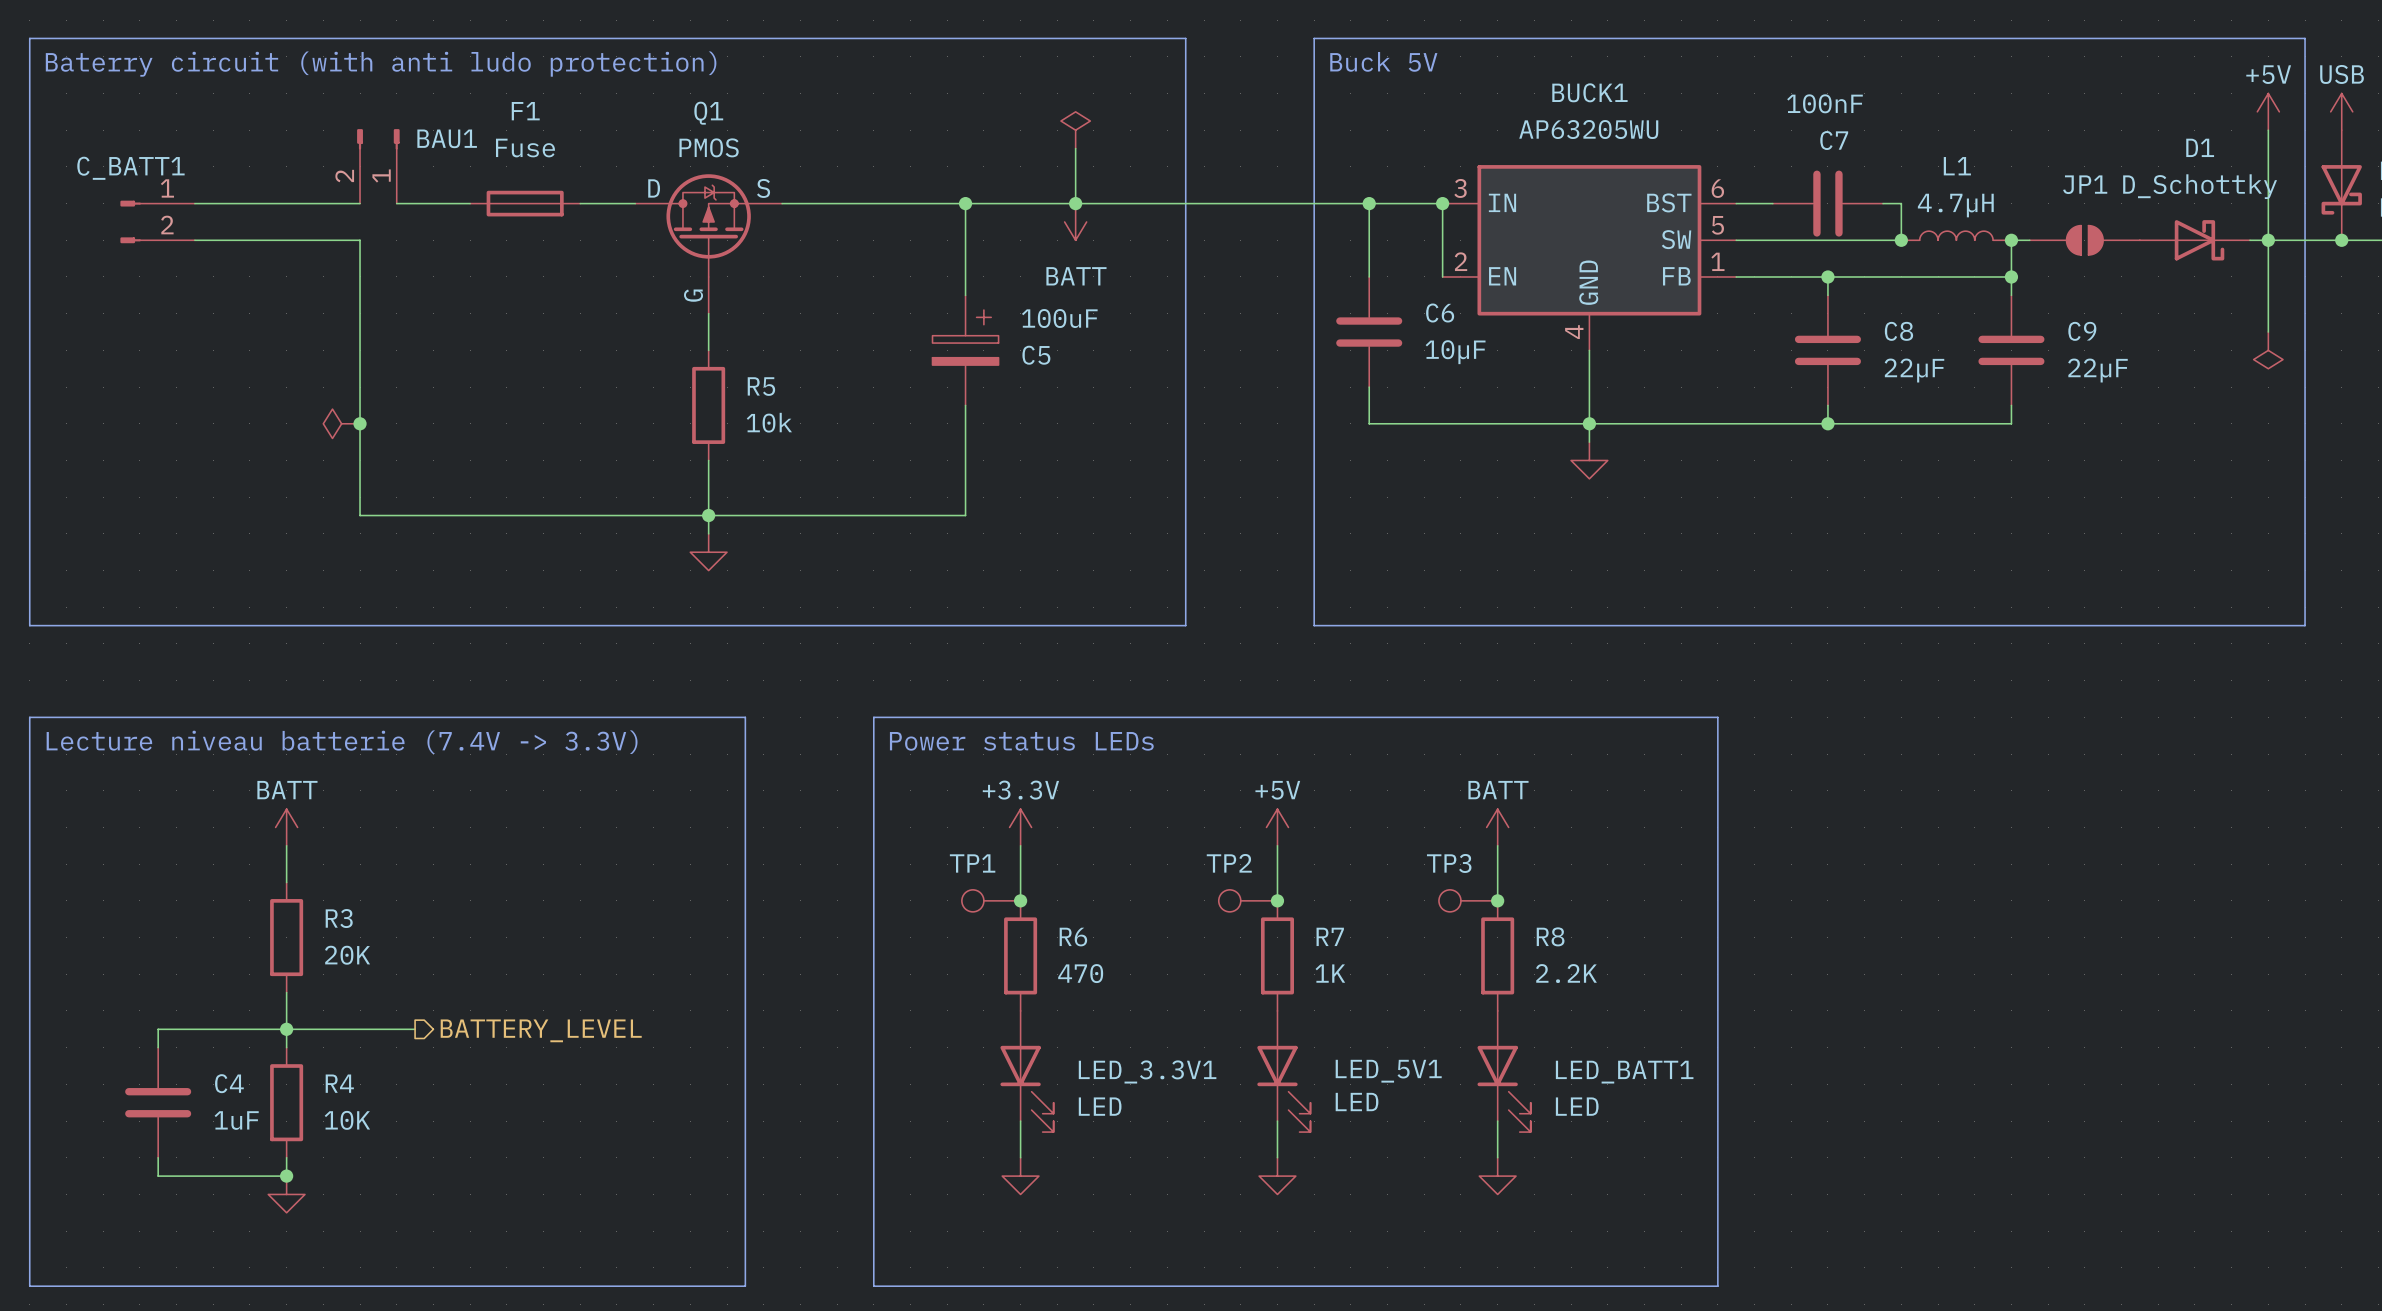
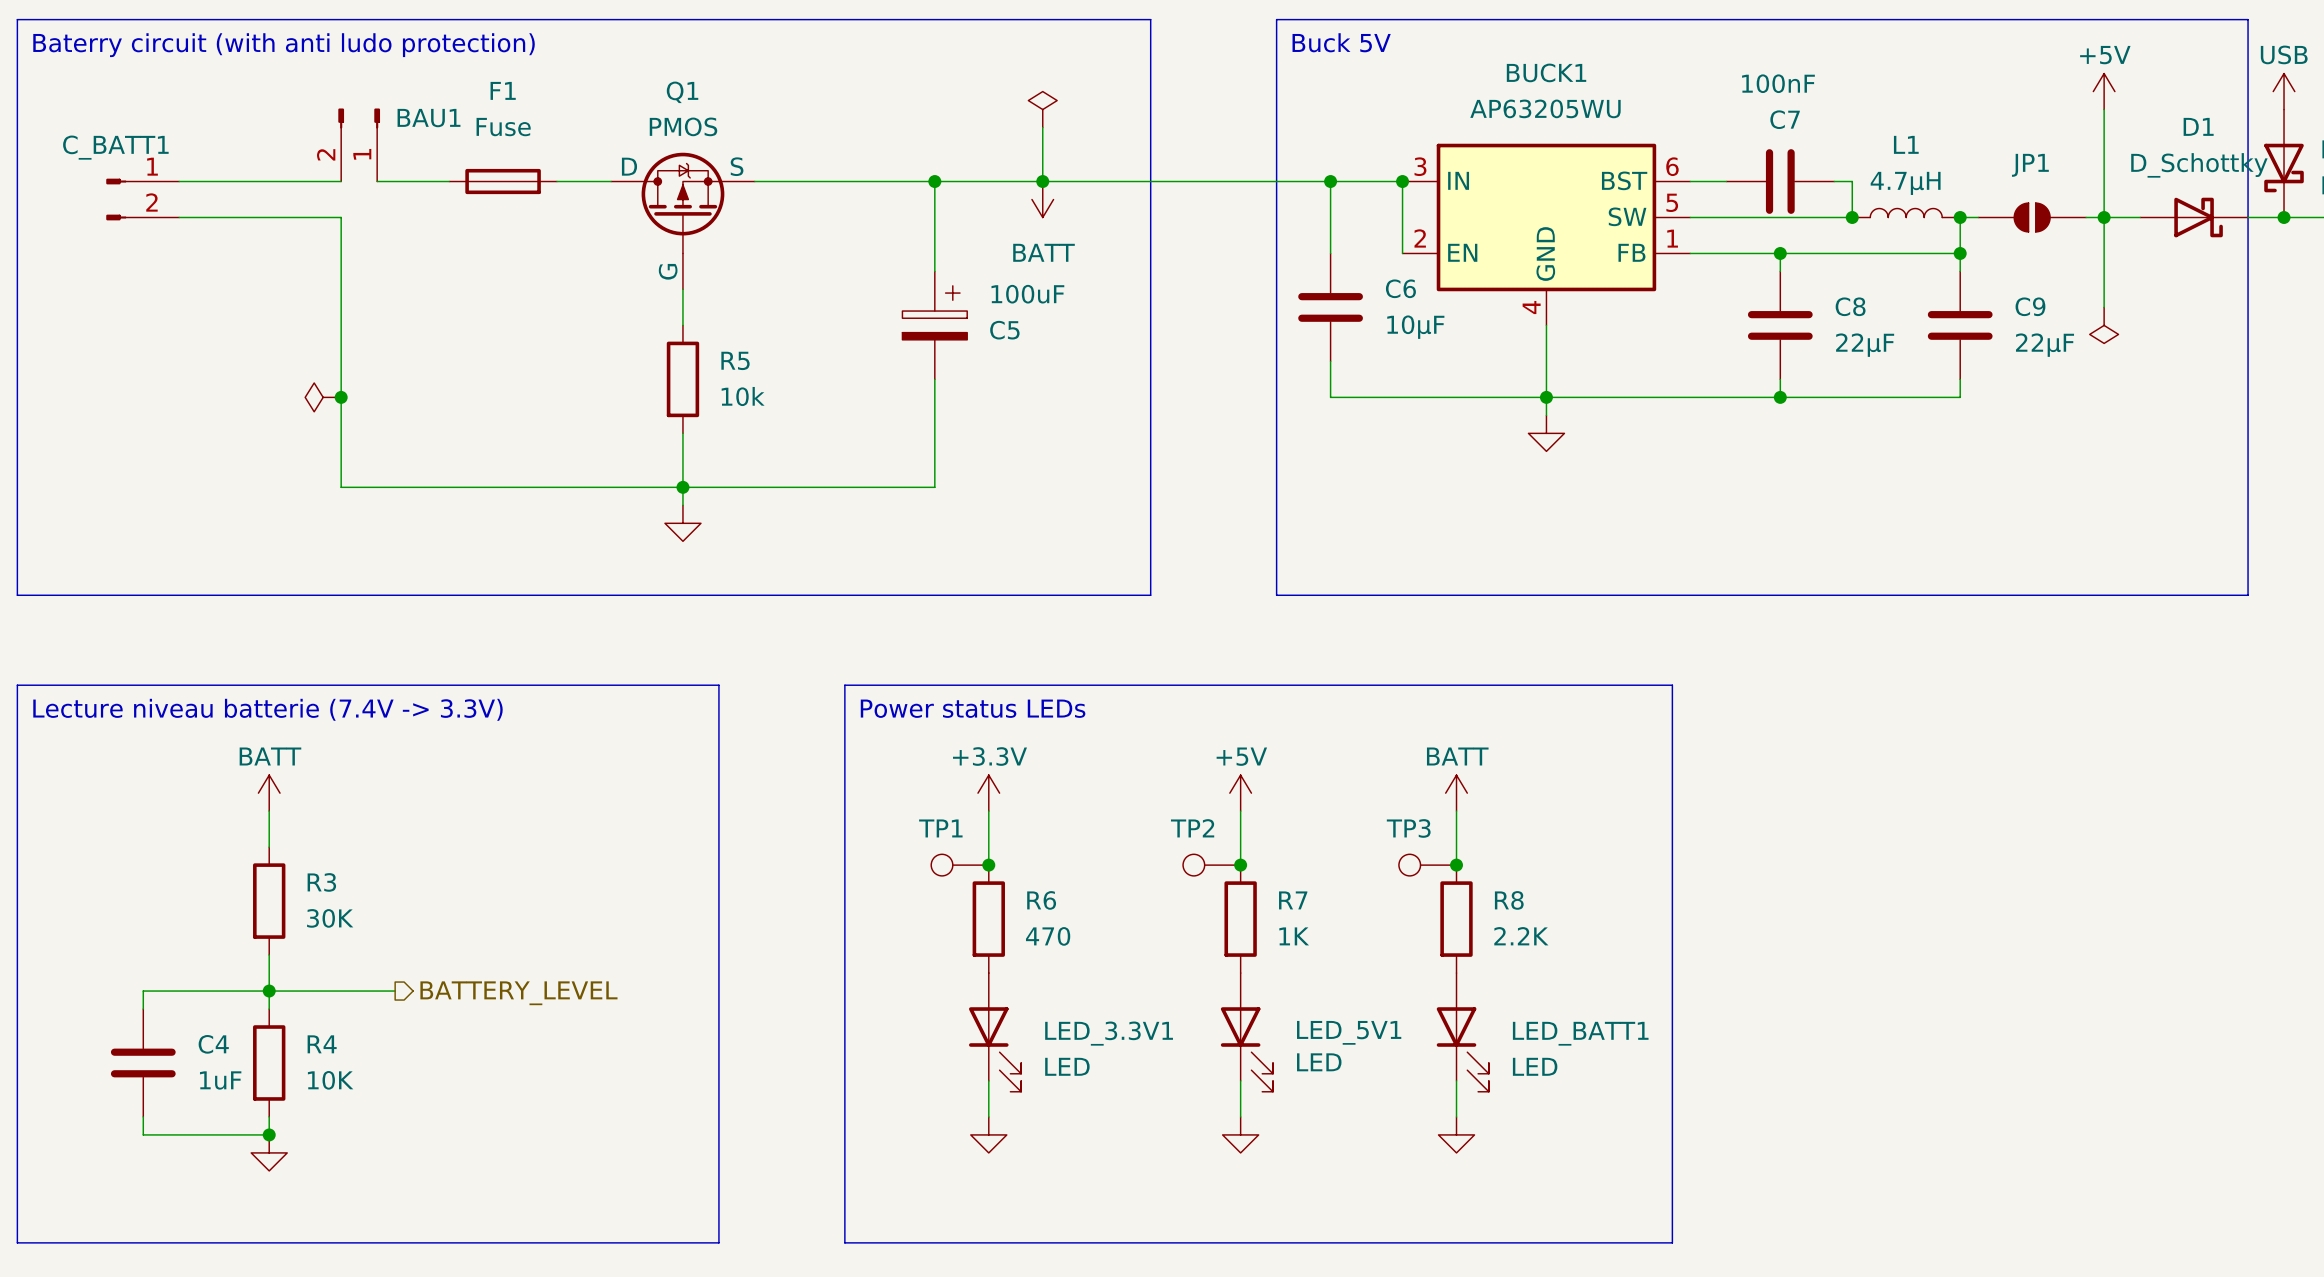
power symbol position: +5V (2268, 111) -> +5V (2104, 91)
wire: (2268, 130) (2268, 332) -> (2104, 109) (2104, 307)
junction: none -> (2104, 217)
D1 position: (2194, 240) -> (2194, 217)
junction: (2268, 240) -> none
power symbol position: (2268, 350) -> (2104, 325)
R3 value: 20K (347, 955) -> 30K (330, 918)

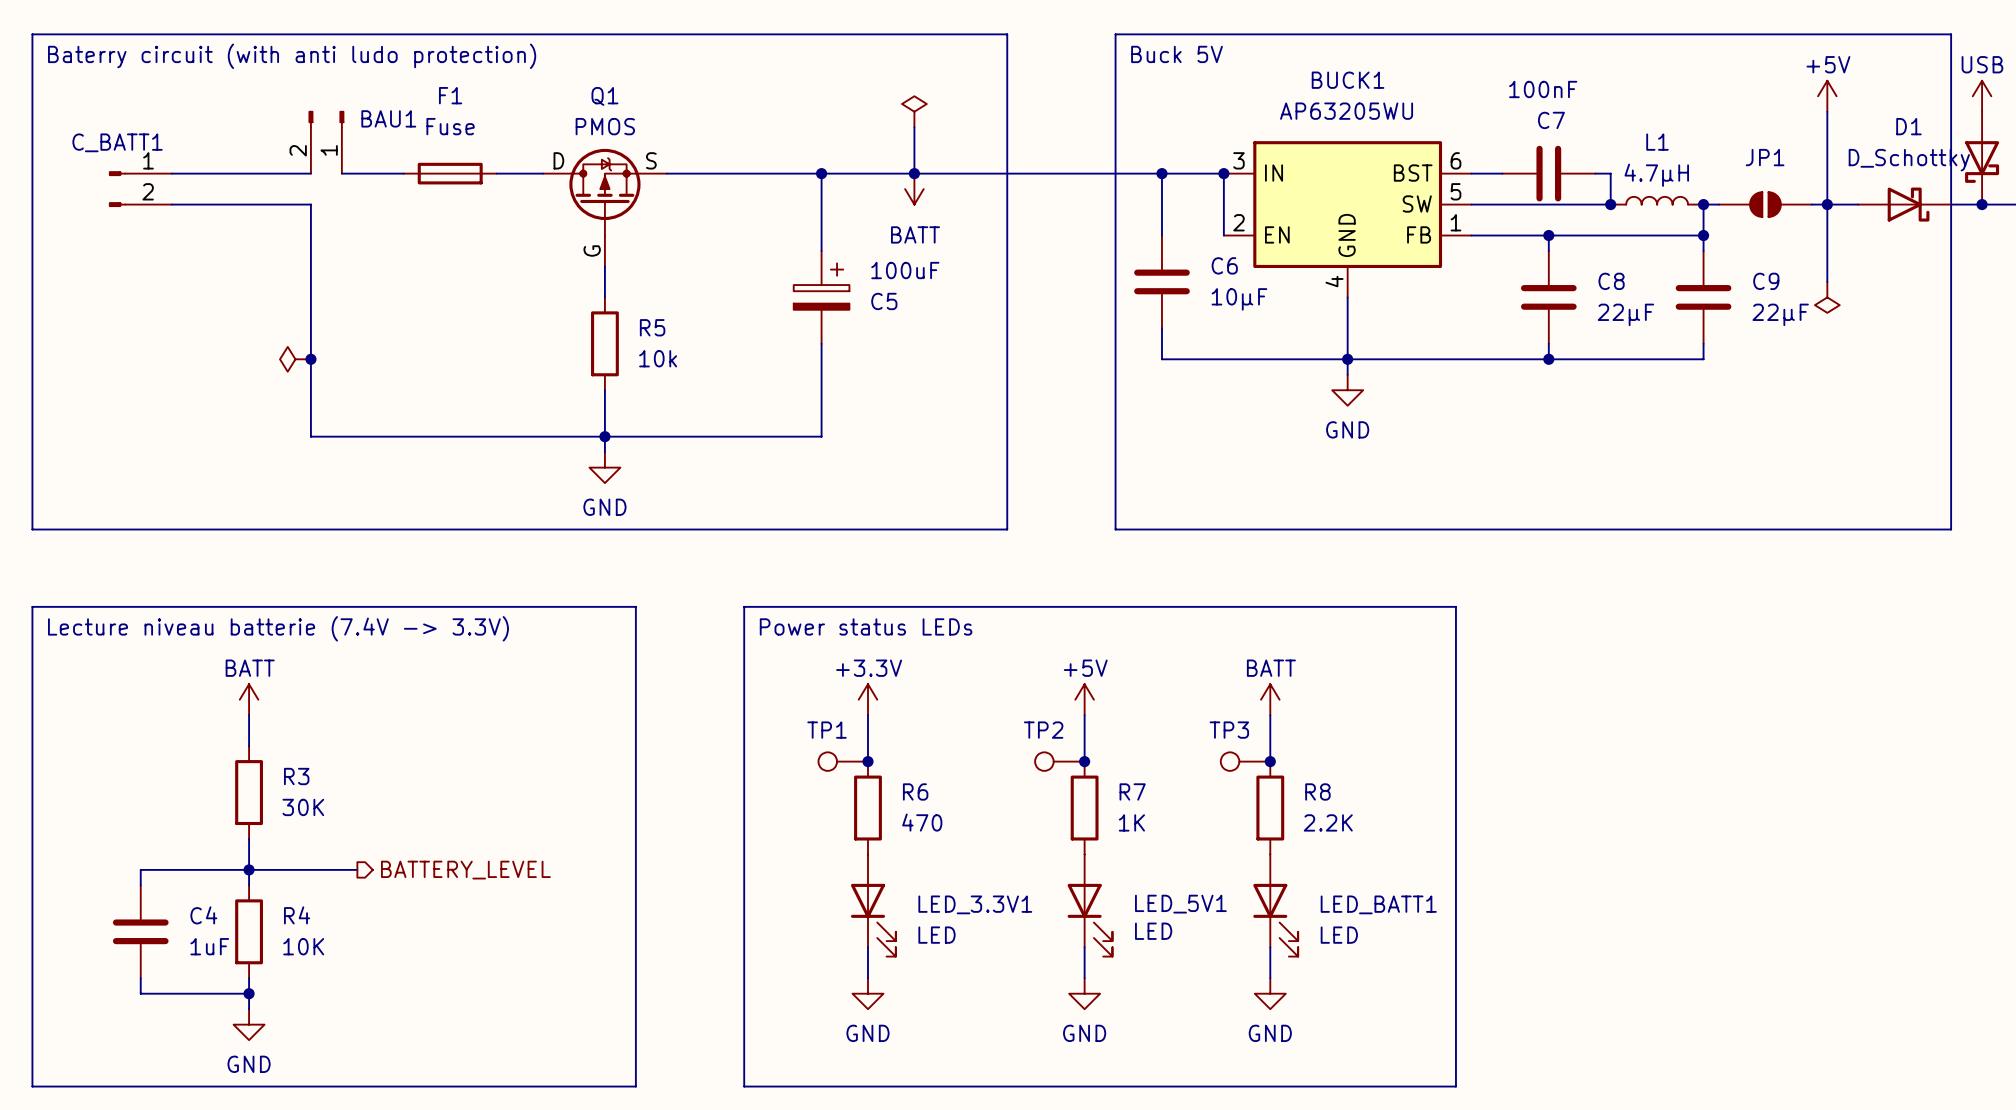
power symbol text: none -> GND (1347, 429)
power symbol text: none -> GND (604, 507)
power symbol: (269, 1152) -> none
power symbol: none -> GND (249, 1024)
power symbol text: none -> GND (867, 1033)
power symbol text: none -> GND (1084, 1033)
power symbol text: none -> GND (1270, 1033)

